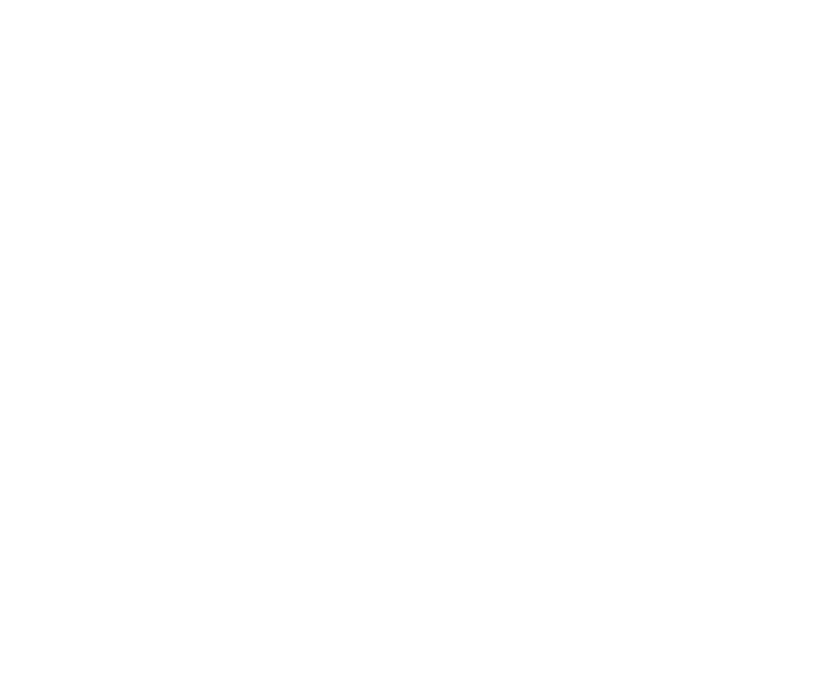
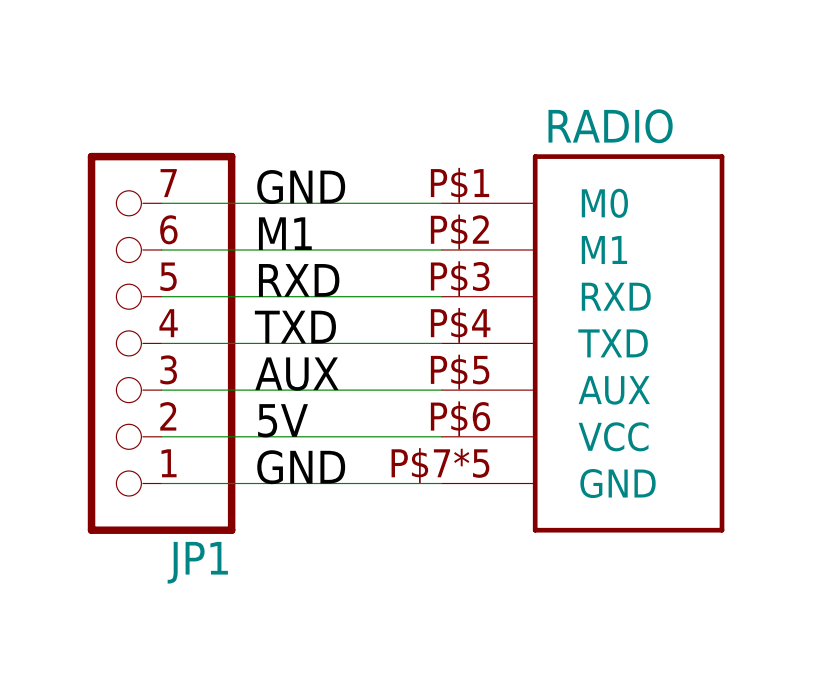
label: none -> GND (301, 186)
wire: none -> (161, 203) (441, 203)
label: none -> M1 (285, 233)
wire: none -> (161, 250) (441, 250)
label: none -> RXD (299, 280)
wire: none -> (161, 296) (441, 296)
label: none -> TXD (295, 327)
wire: none -> (161, 343) (441, 343)
JP1: none -> (161, 343)
RADIO: none -> (583, 343)
label: none -> AUX (296, 374)
wire: none -> (161, 390) (441, 390)
label: none -> 5V (283, 420)
wire: none -> (161, 436) (441, 436)
label: none -> GND (301, 467)
wire: none -> (161, 483) (441, 483)

